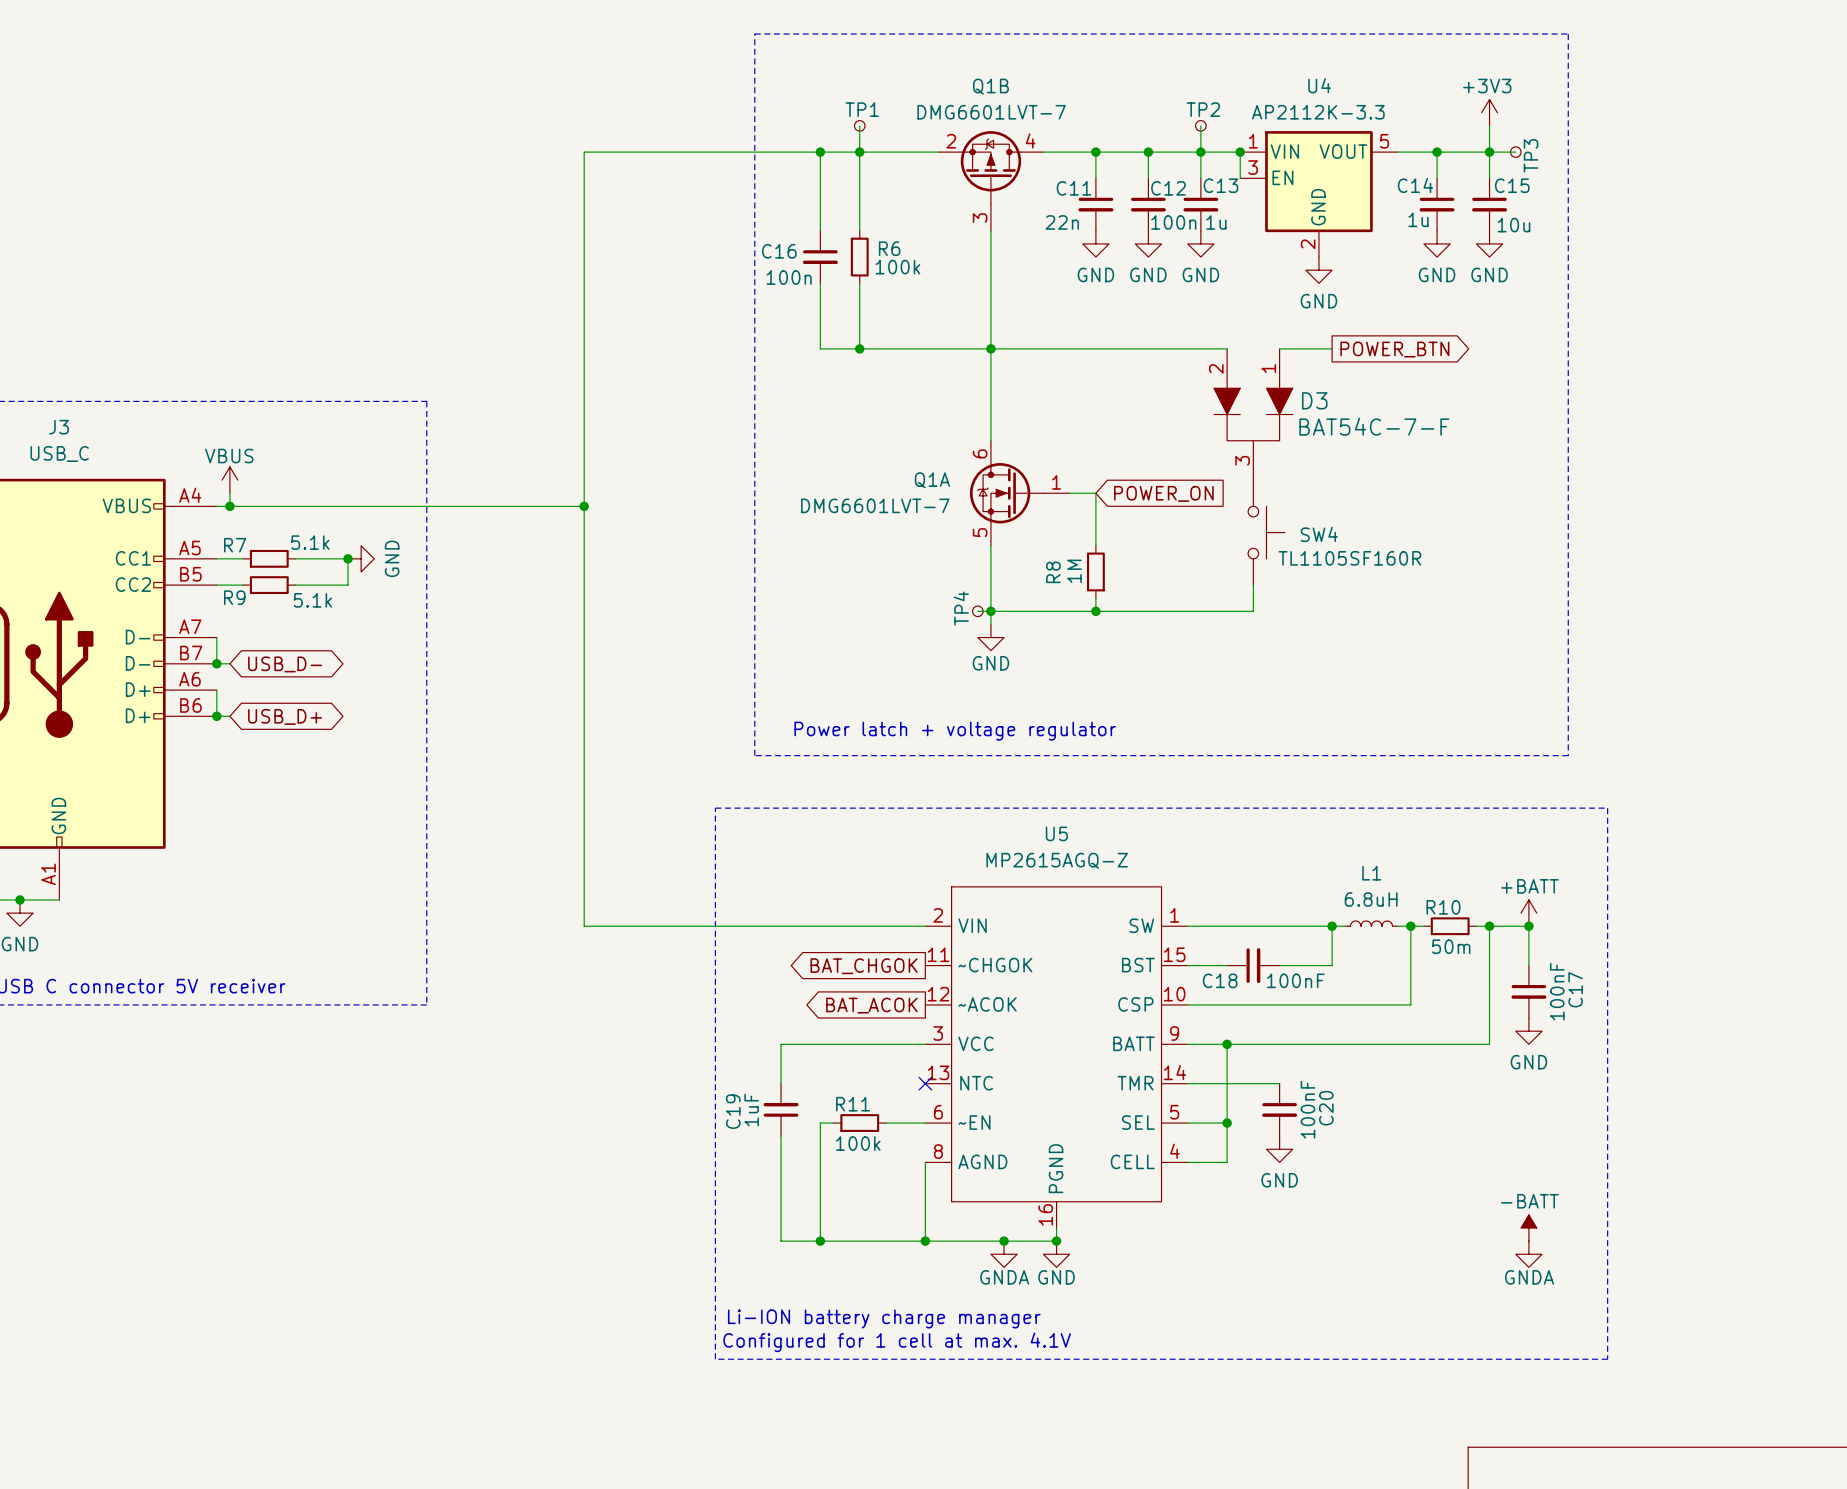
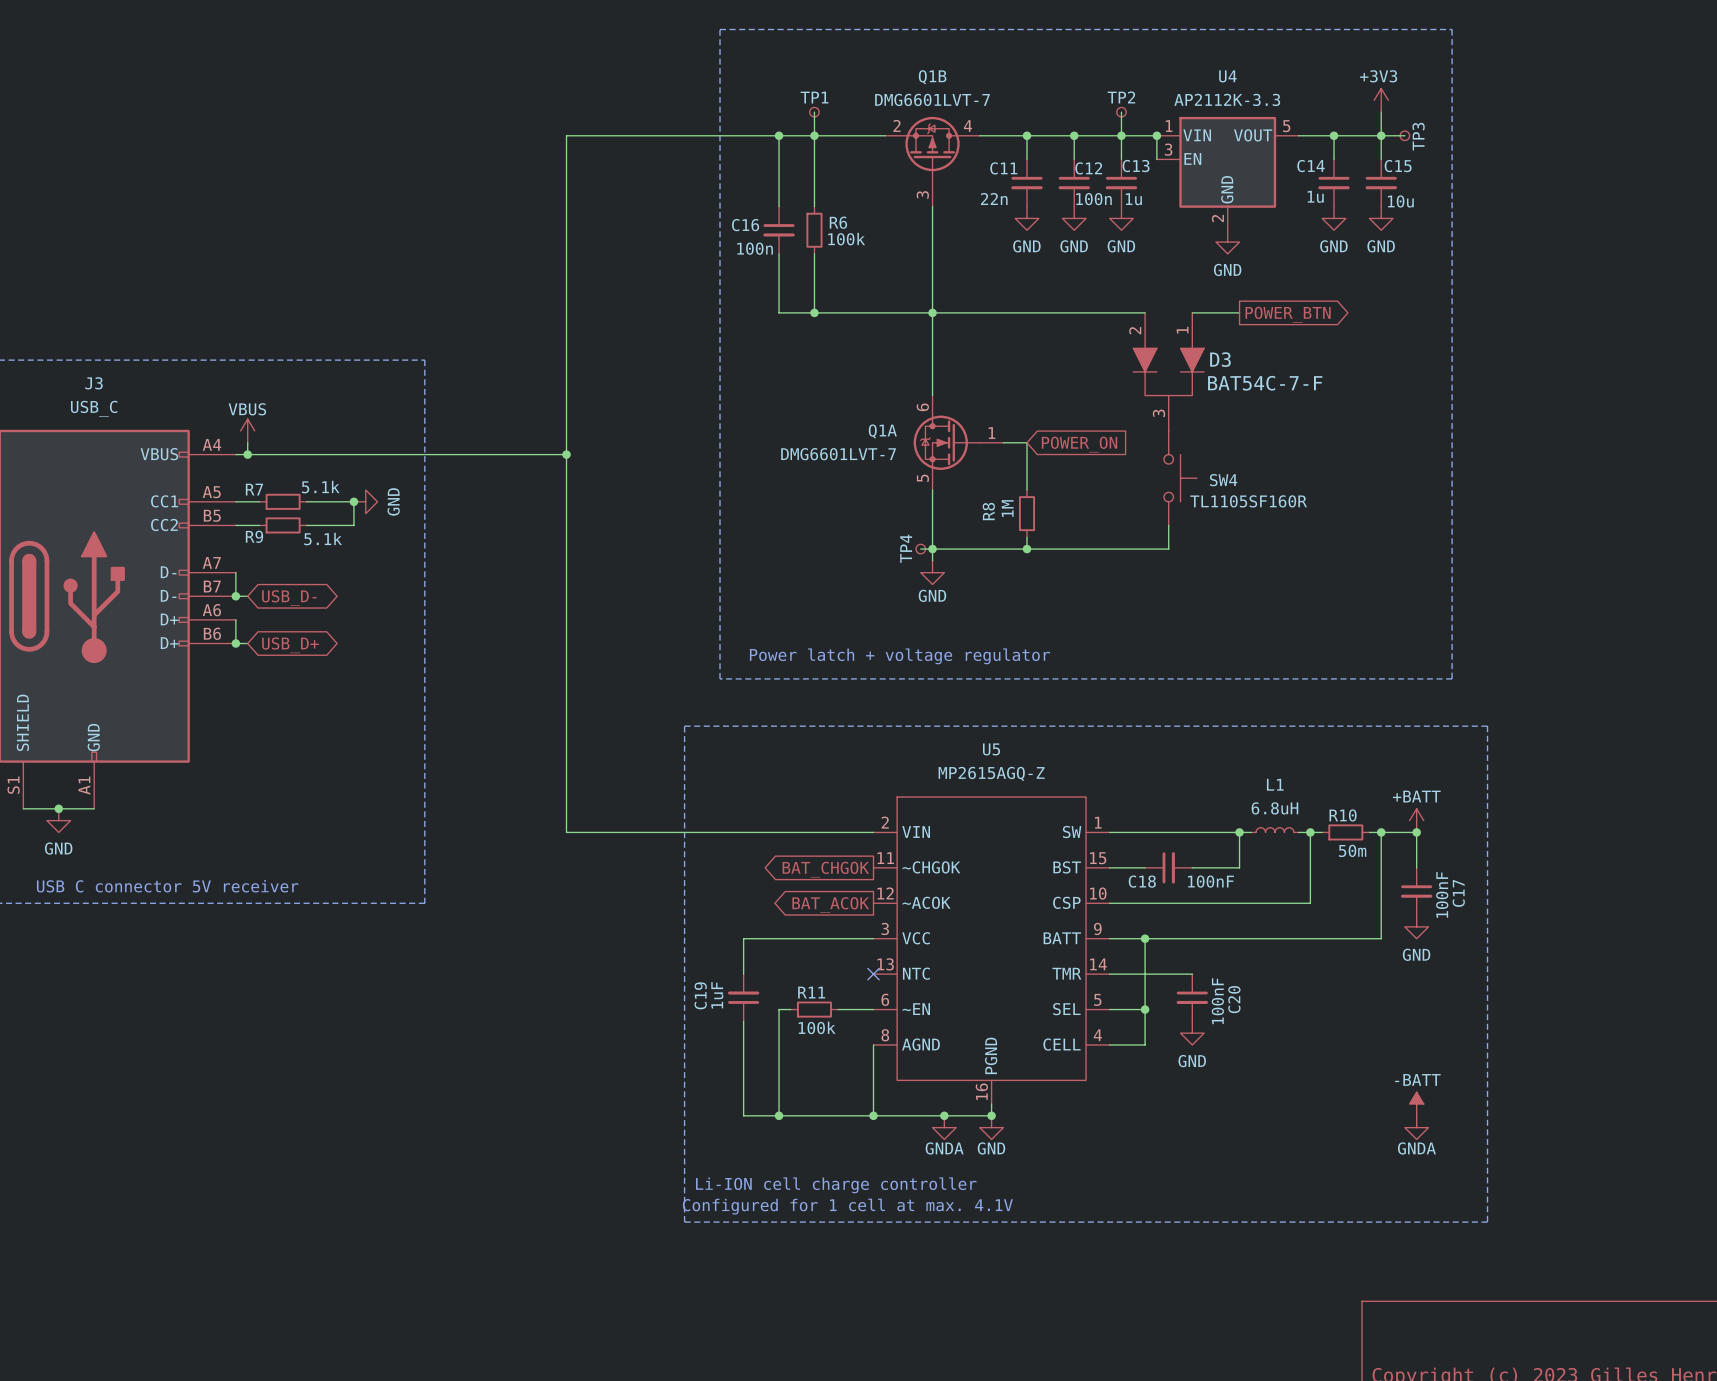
text: Li-ION battery charge manager (884, 1318) -> Li-ION cell charge controller (836, 1185)

